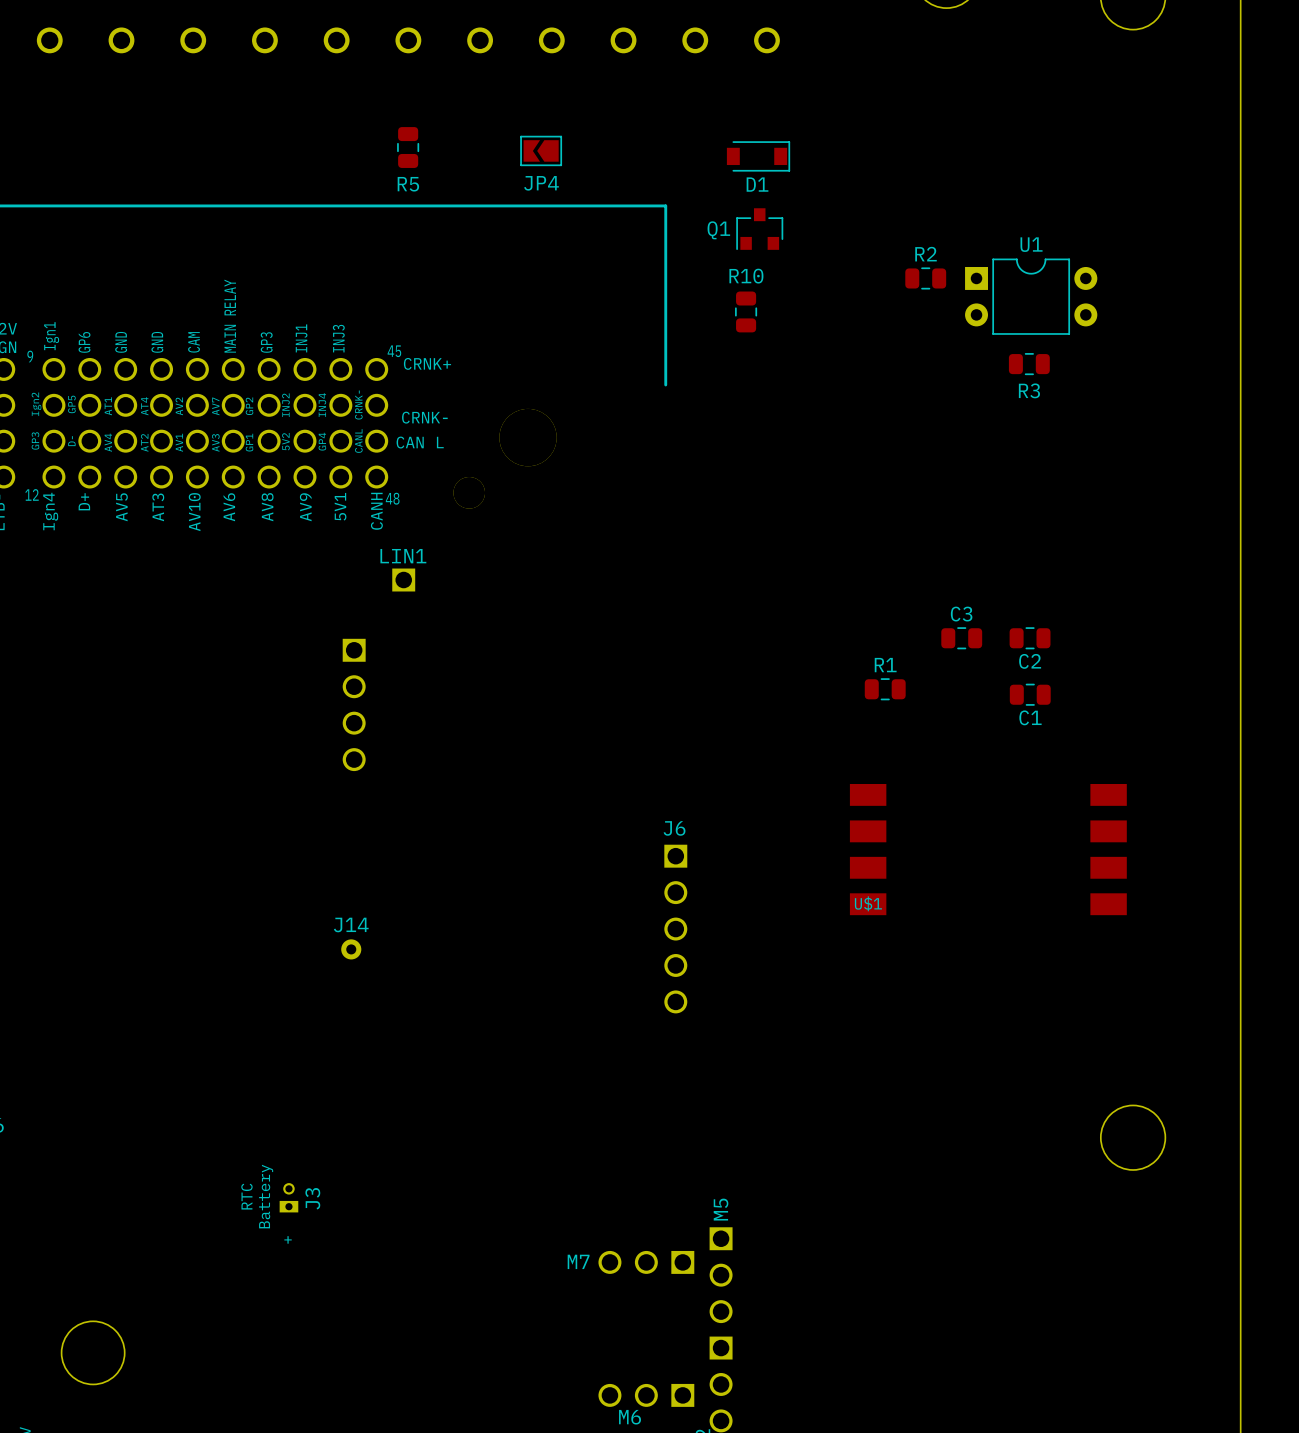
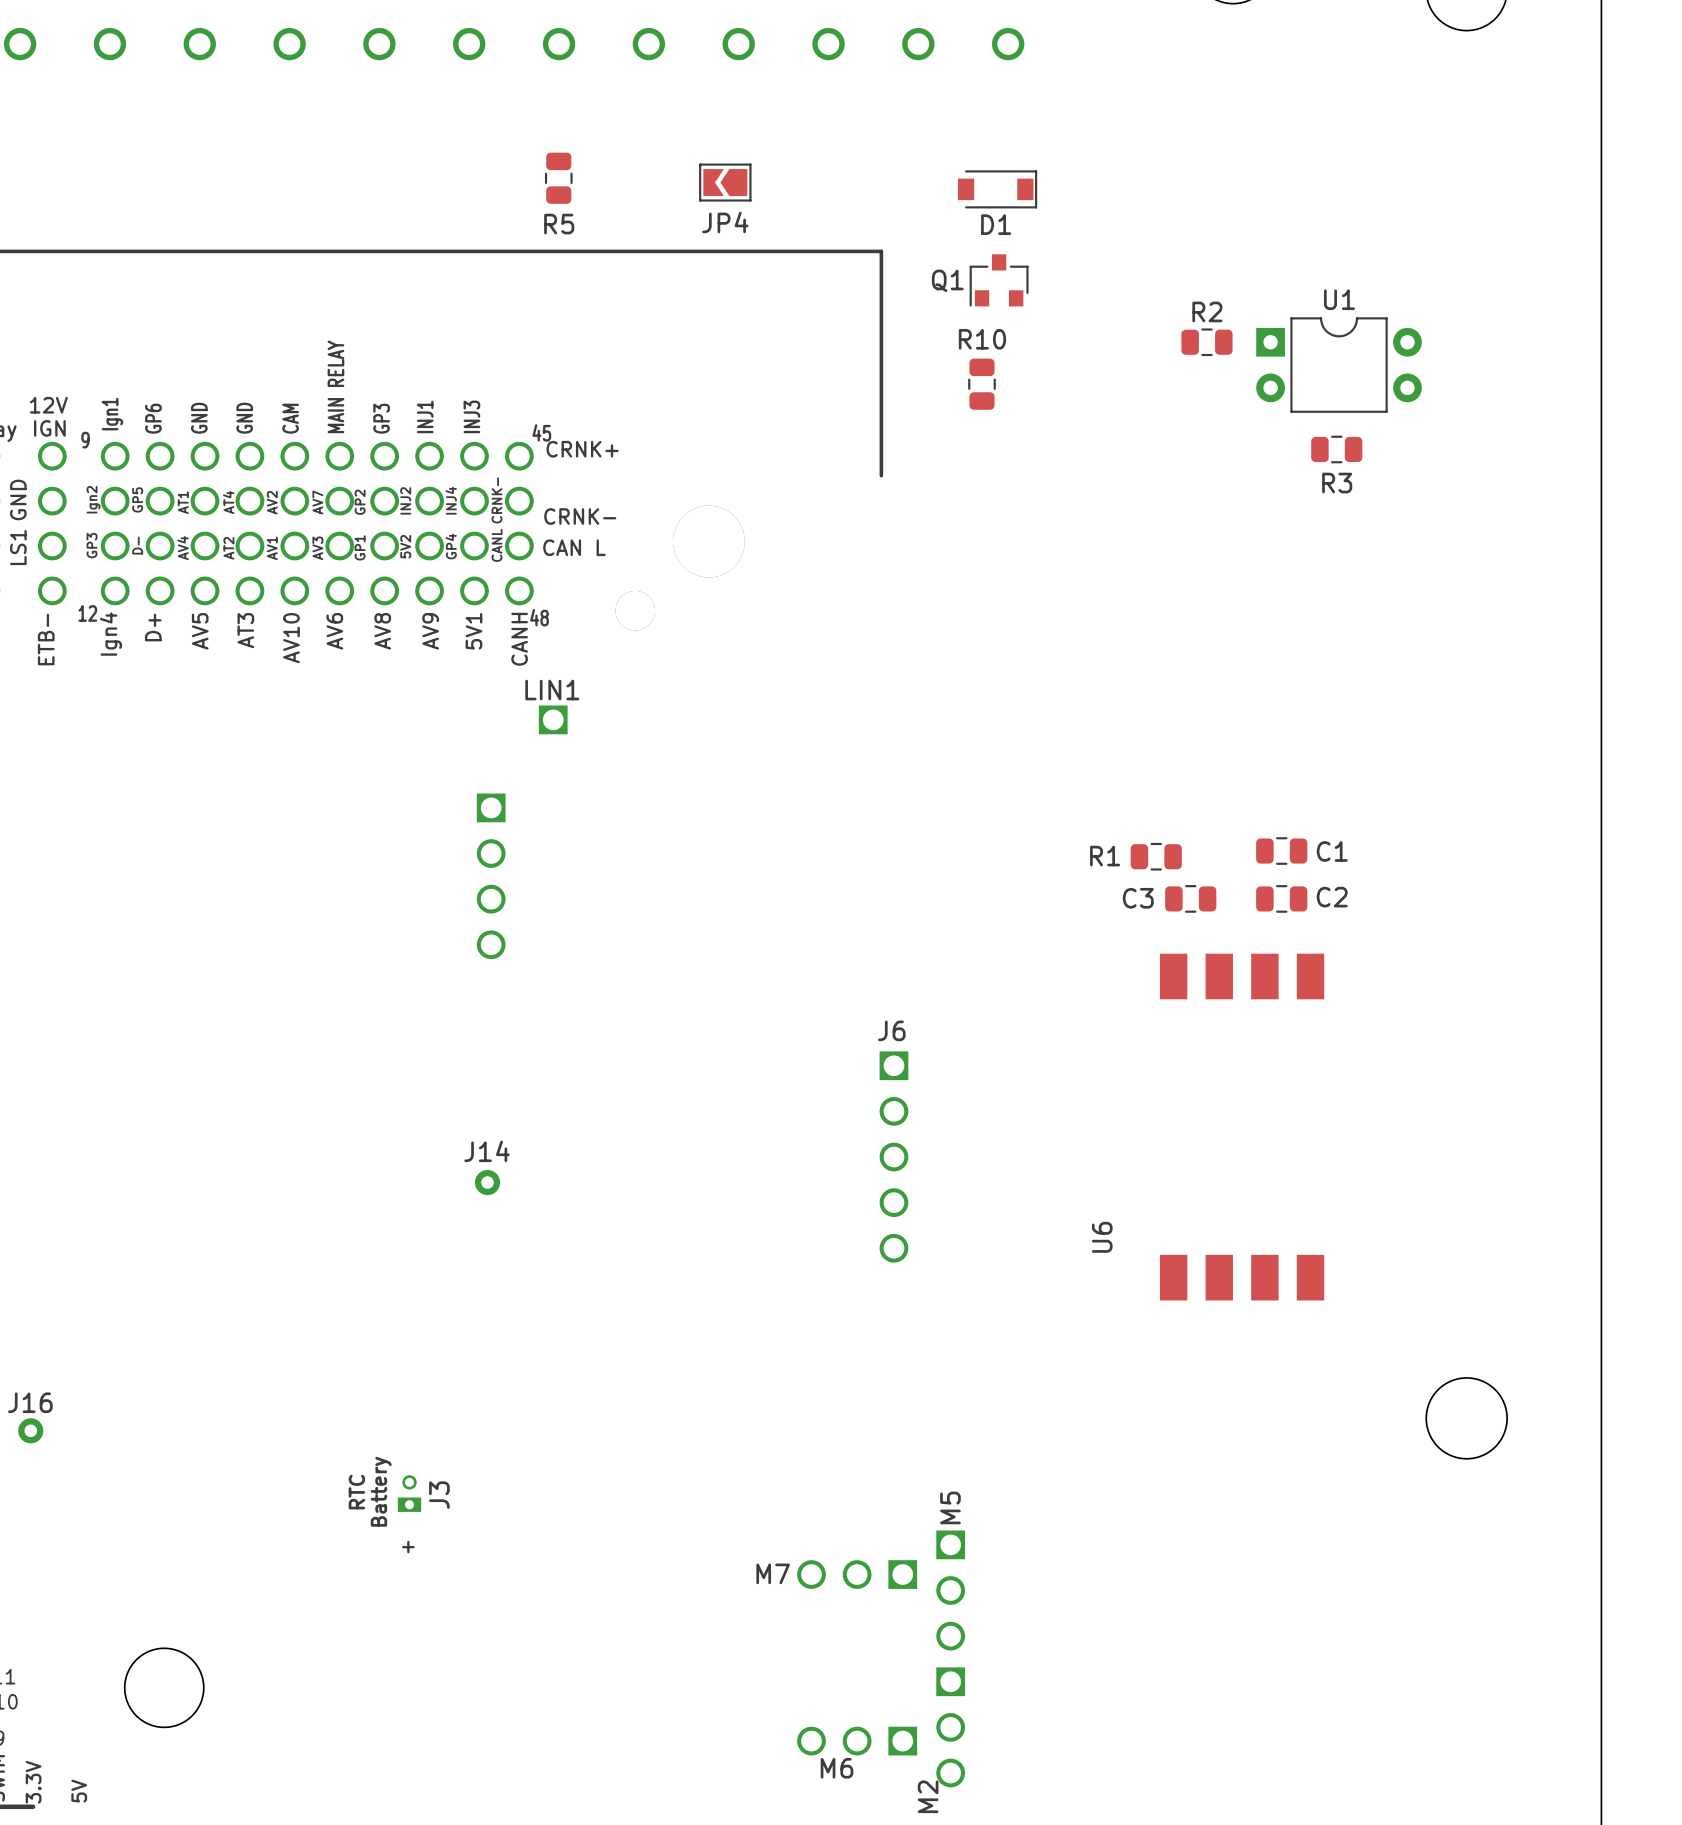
C3 name position: C3 (961, 614) -> C3 (1138, 898)
C3 position: (961, 638) -> (1190, 898)
C2 position: (1030, 638) -> (1281, 898)
C2 name position: C2 (1030, 661) -> C2 (1332, 897)
R1 name position: R1 (885, 665) -> R1 (1105, 856)
C1 position: (1030, 694) -> (1281, 851)
C1 name position: C1 (1030, 717) -> C1 (1332, 851)
U$1: (988, 849) -> none
U6: none -> (1242, 1127)

